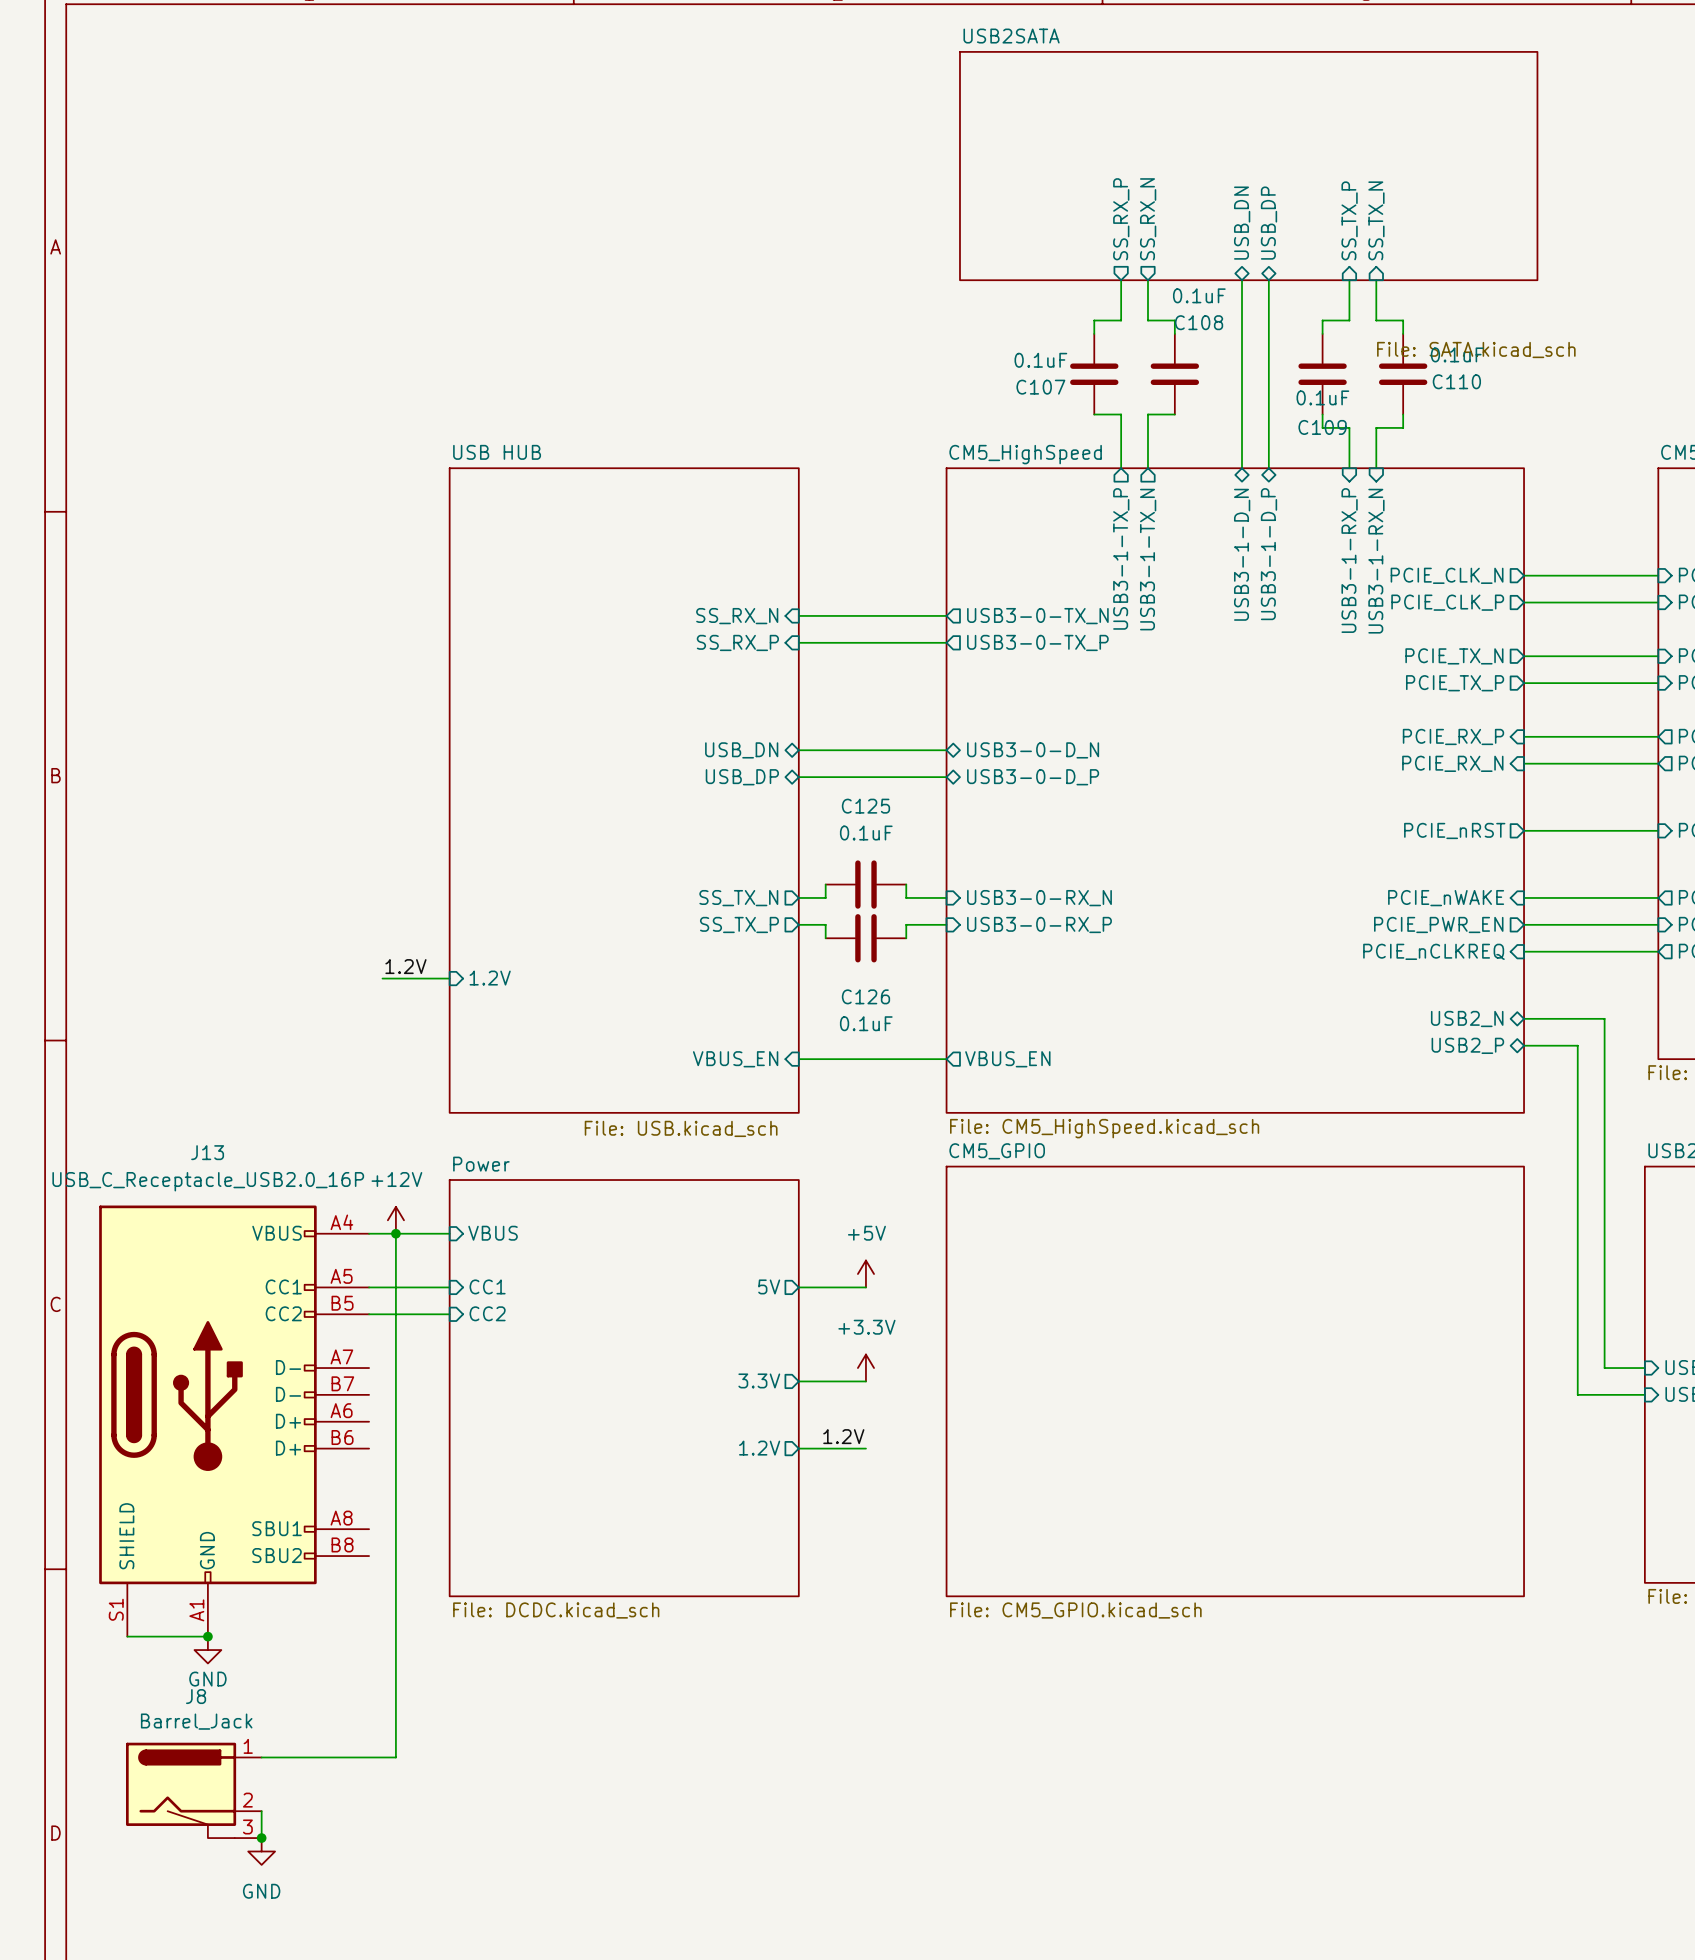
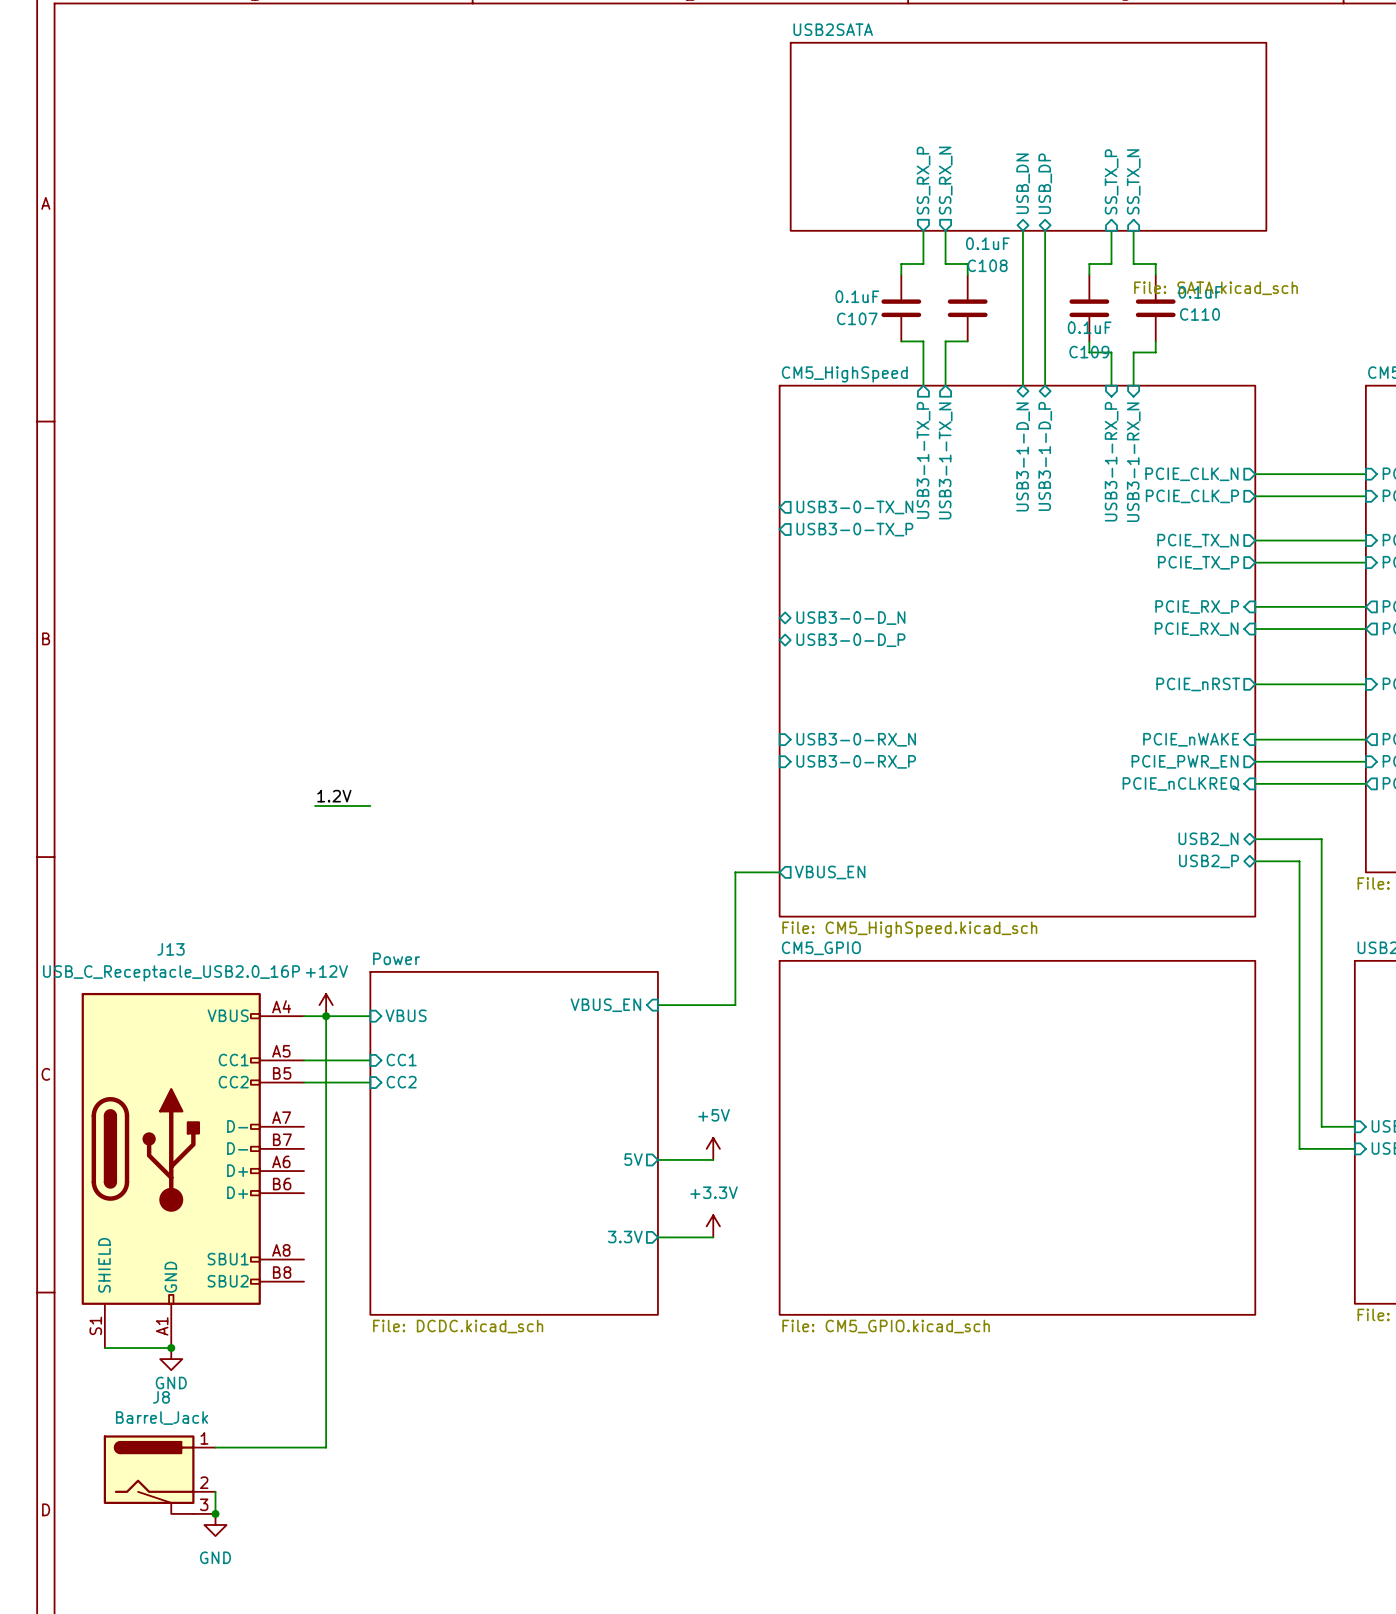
wire: (798, 615) (946, 615) -> none
sheet pin: SS_RX_N (737, 616) -> none
sheet pin: SS_RX_P (737, 642) -> none
wire: (798, 642) (946, 642) -> none
sheet pin: USB_DN (741, 750) -> none
wire: (798, 750) (946, 750) -> none
sheet pin: USB_DP (742, 777) -> none
wire: (798, 777) (946, 777) -> none
sheet USB HUB: File: USB.kicad_sch (624, 790) -> none
wire: (825, 884) (825, 897) (798, 897) -> none
C125: 0.1uF (865, 884) -> none
wire: (906, 884) (906, 897) (946, 897) -> none
sheet pin: SS_TX_N (738, 898) -> none
sheet pin: SS_TX_P (739, 924) -> none
wire: (798, 924) (825, 924) (825, 938) -> none
wire: (946, 924) (906, 924) (906, 938) -> none
C126: 0.1uF (865, 938) -> none
sheet pin: 1.2V (490, 978) -> none
sheet pin position: VBUS_EN (735, 1059) -> VBUS_EN (605, 1005)
wire: (798, 1059) (892, 1059) -> (657, 1005) (735, 1005) (735, 872)
power symbol position: +5V (865, 1274) -> +5V (713, 1148)
sheet pin position: 5V (769, 1286) -> 5V (633, 1159)
wire: (798, 1287) (865, 1287) -> (657, 1159) (713, 1159)
power symbol position: +3.3V (865, 1368) -> +3.3V (713, 1226)
sheet pin position: 3.3V (759, 1380) -> 3.3V (625, 1236)
wire: (798, 1381) (865, 1381) -> (657, 1237) (713, 1237)
label: 1.2V (843, 1436) -> none
sheet pin: 1.2V (759, 1448) -> none
wire: (798, 1448) (865, 1448) -> none

